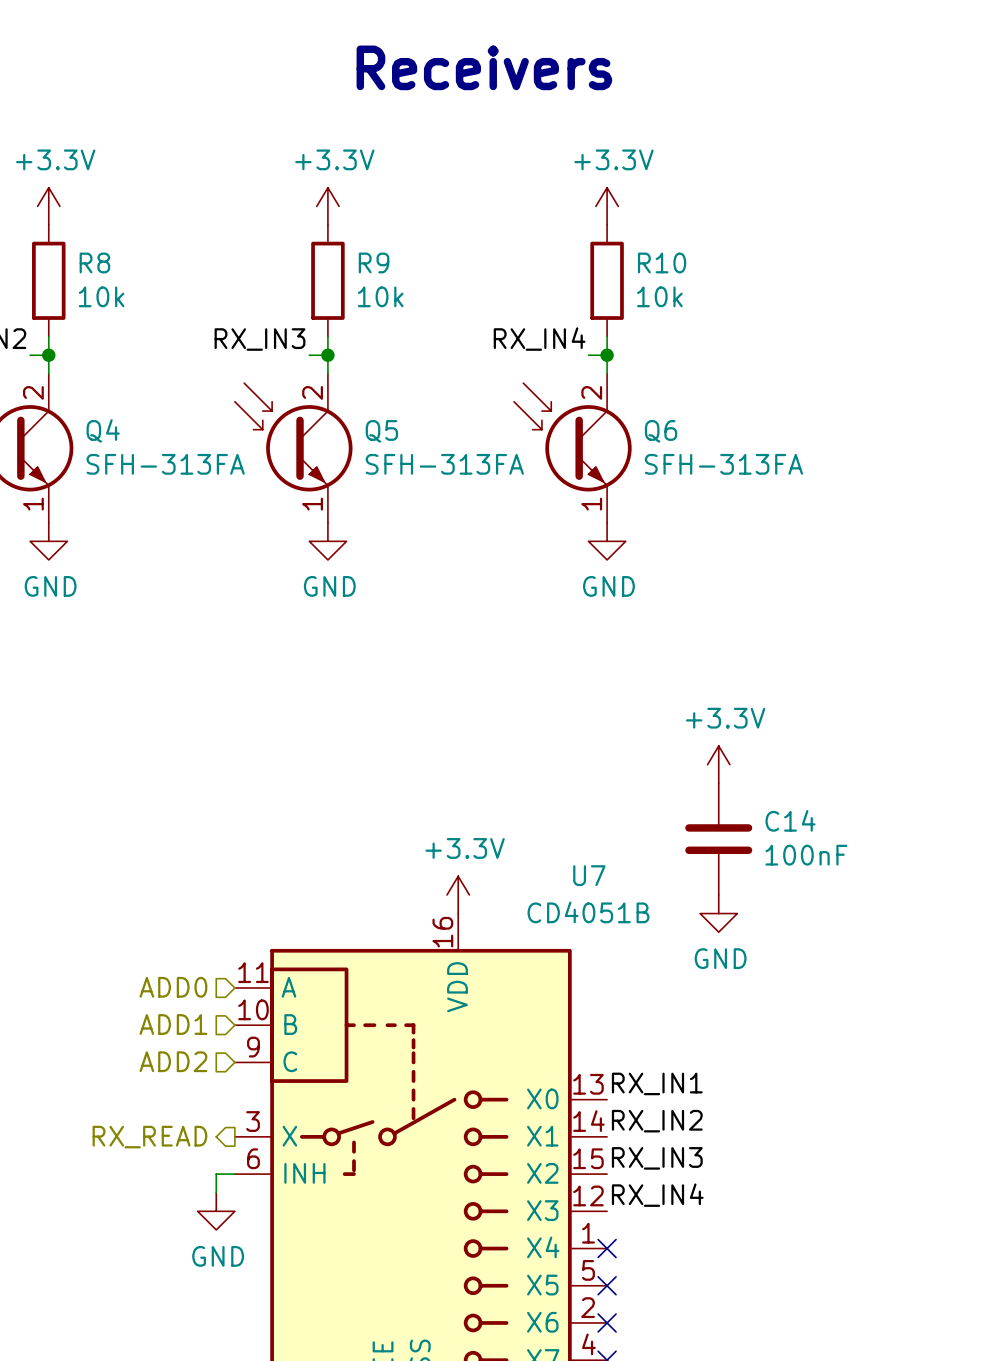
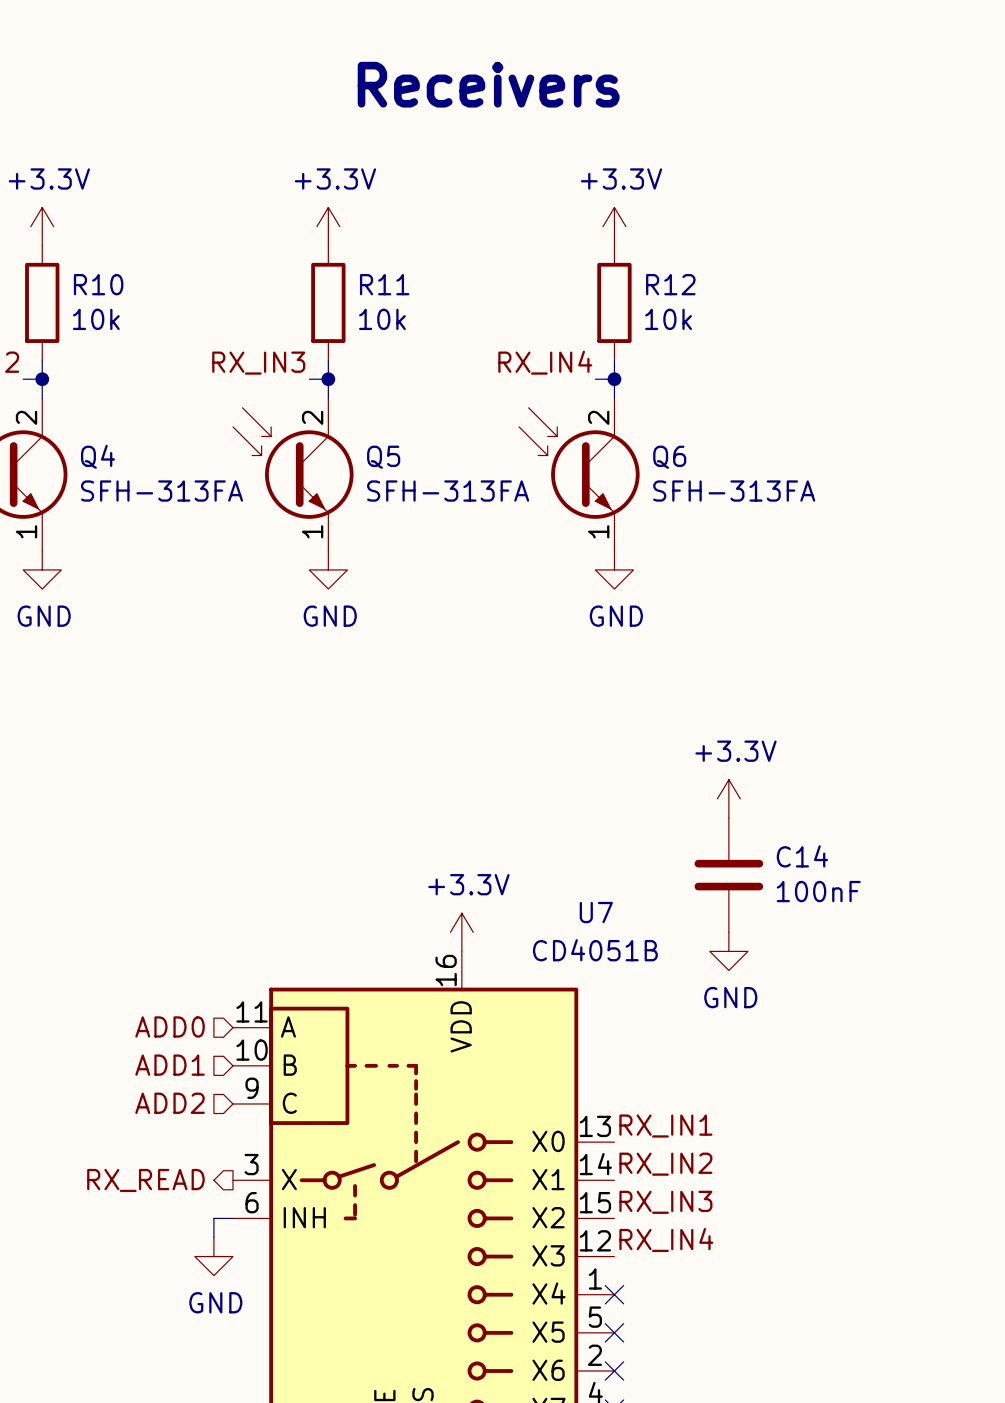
R8 name: R8 (94, 262) -> R10 (98, 284)
R9 name: R9 (374, 262) -> R11 (384, 284)
R10 name: R10 (662, 262) -> R12 (670, 284)

